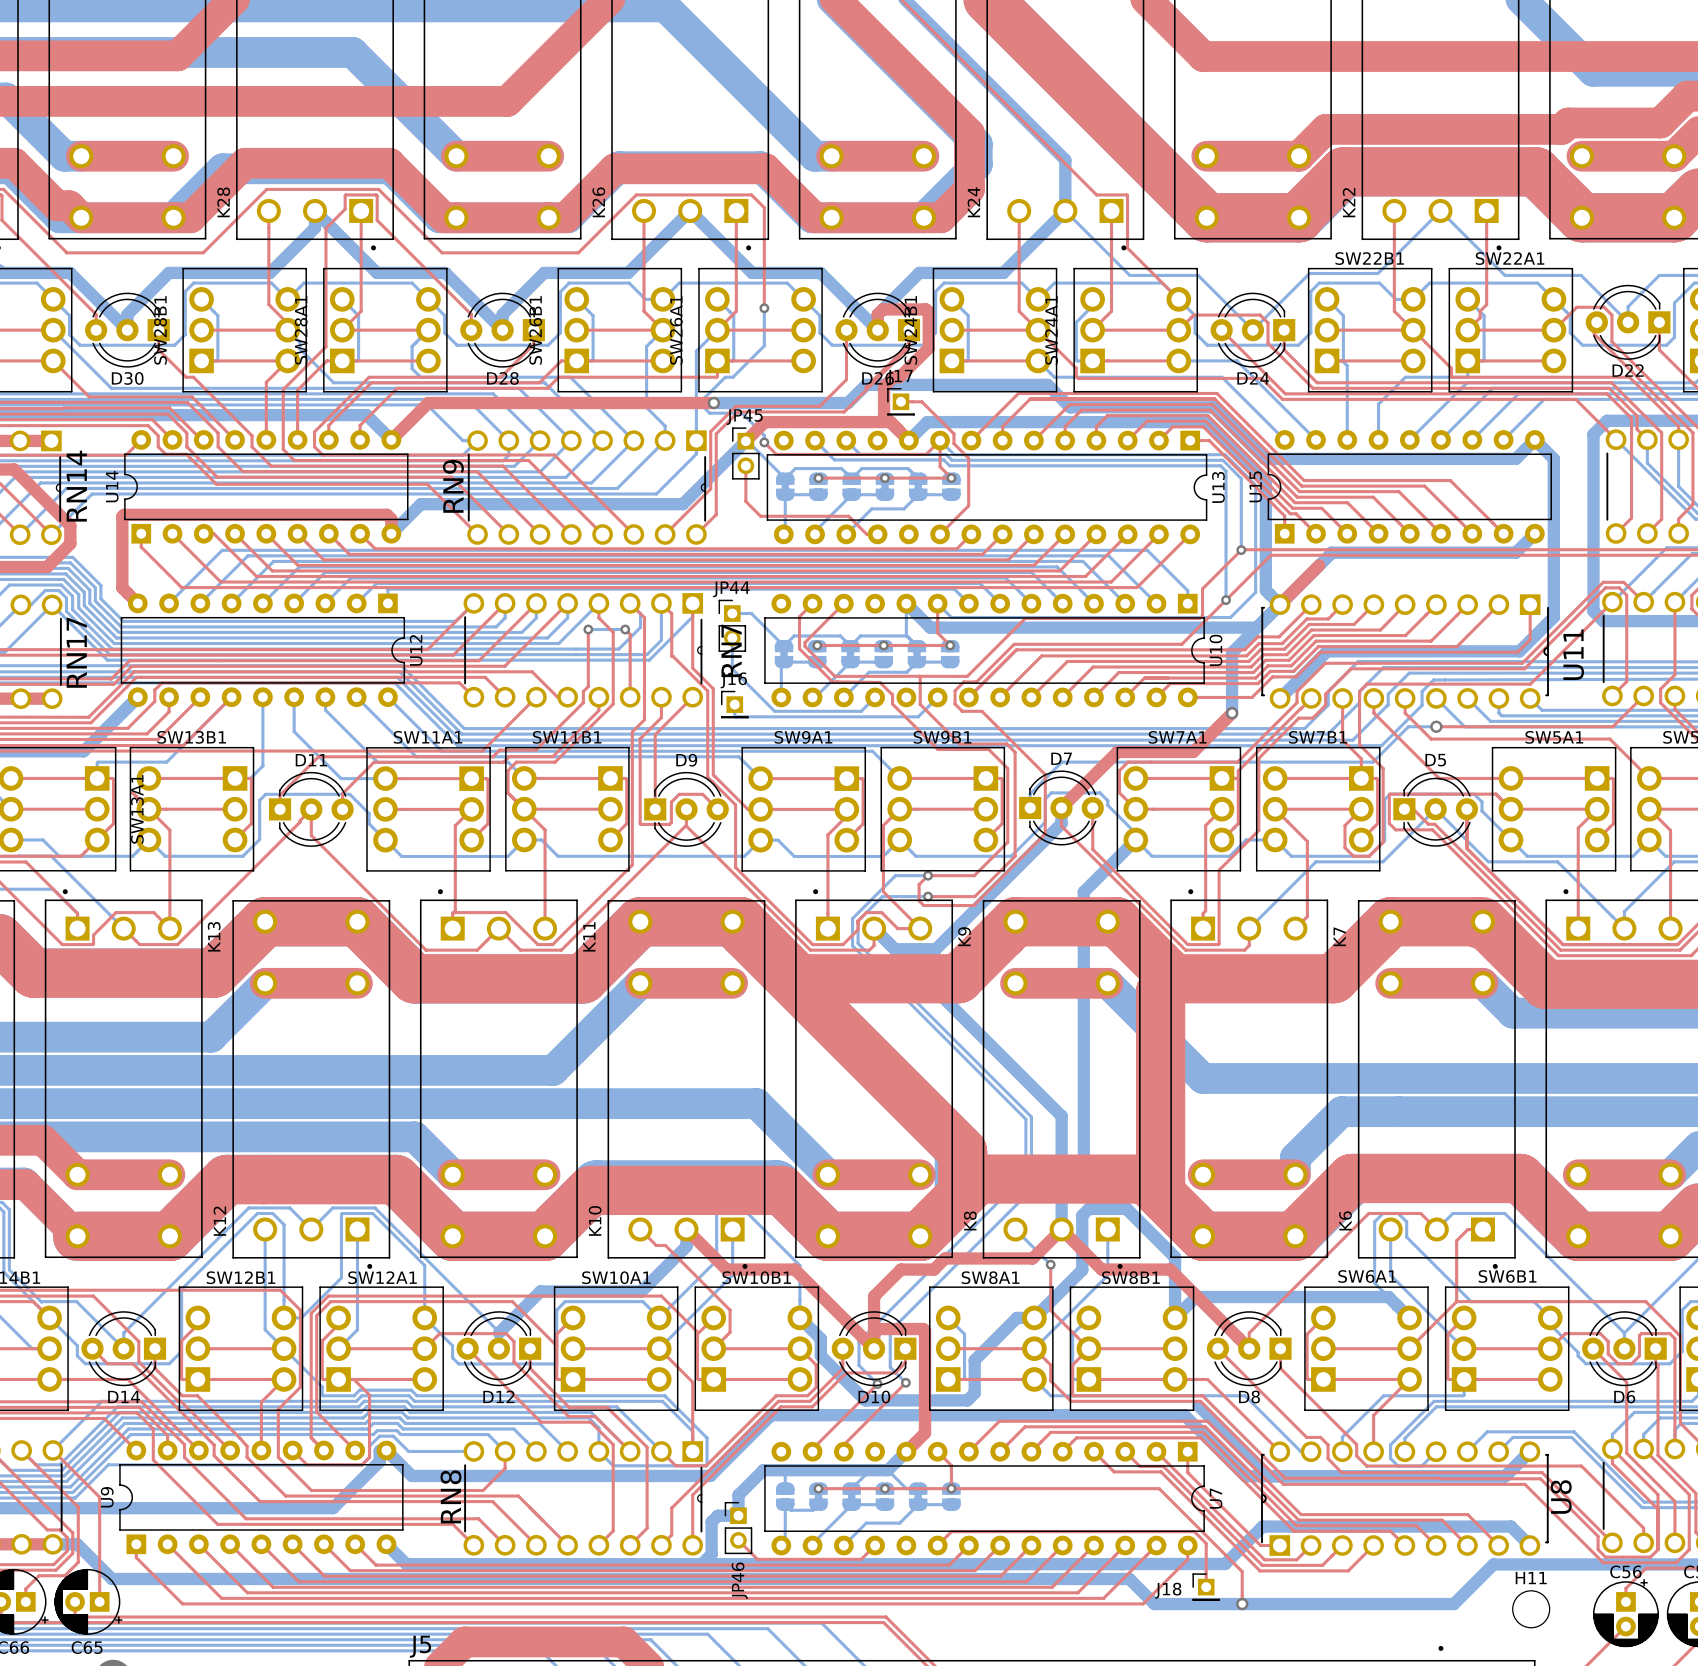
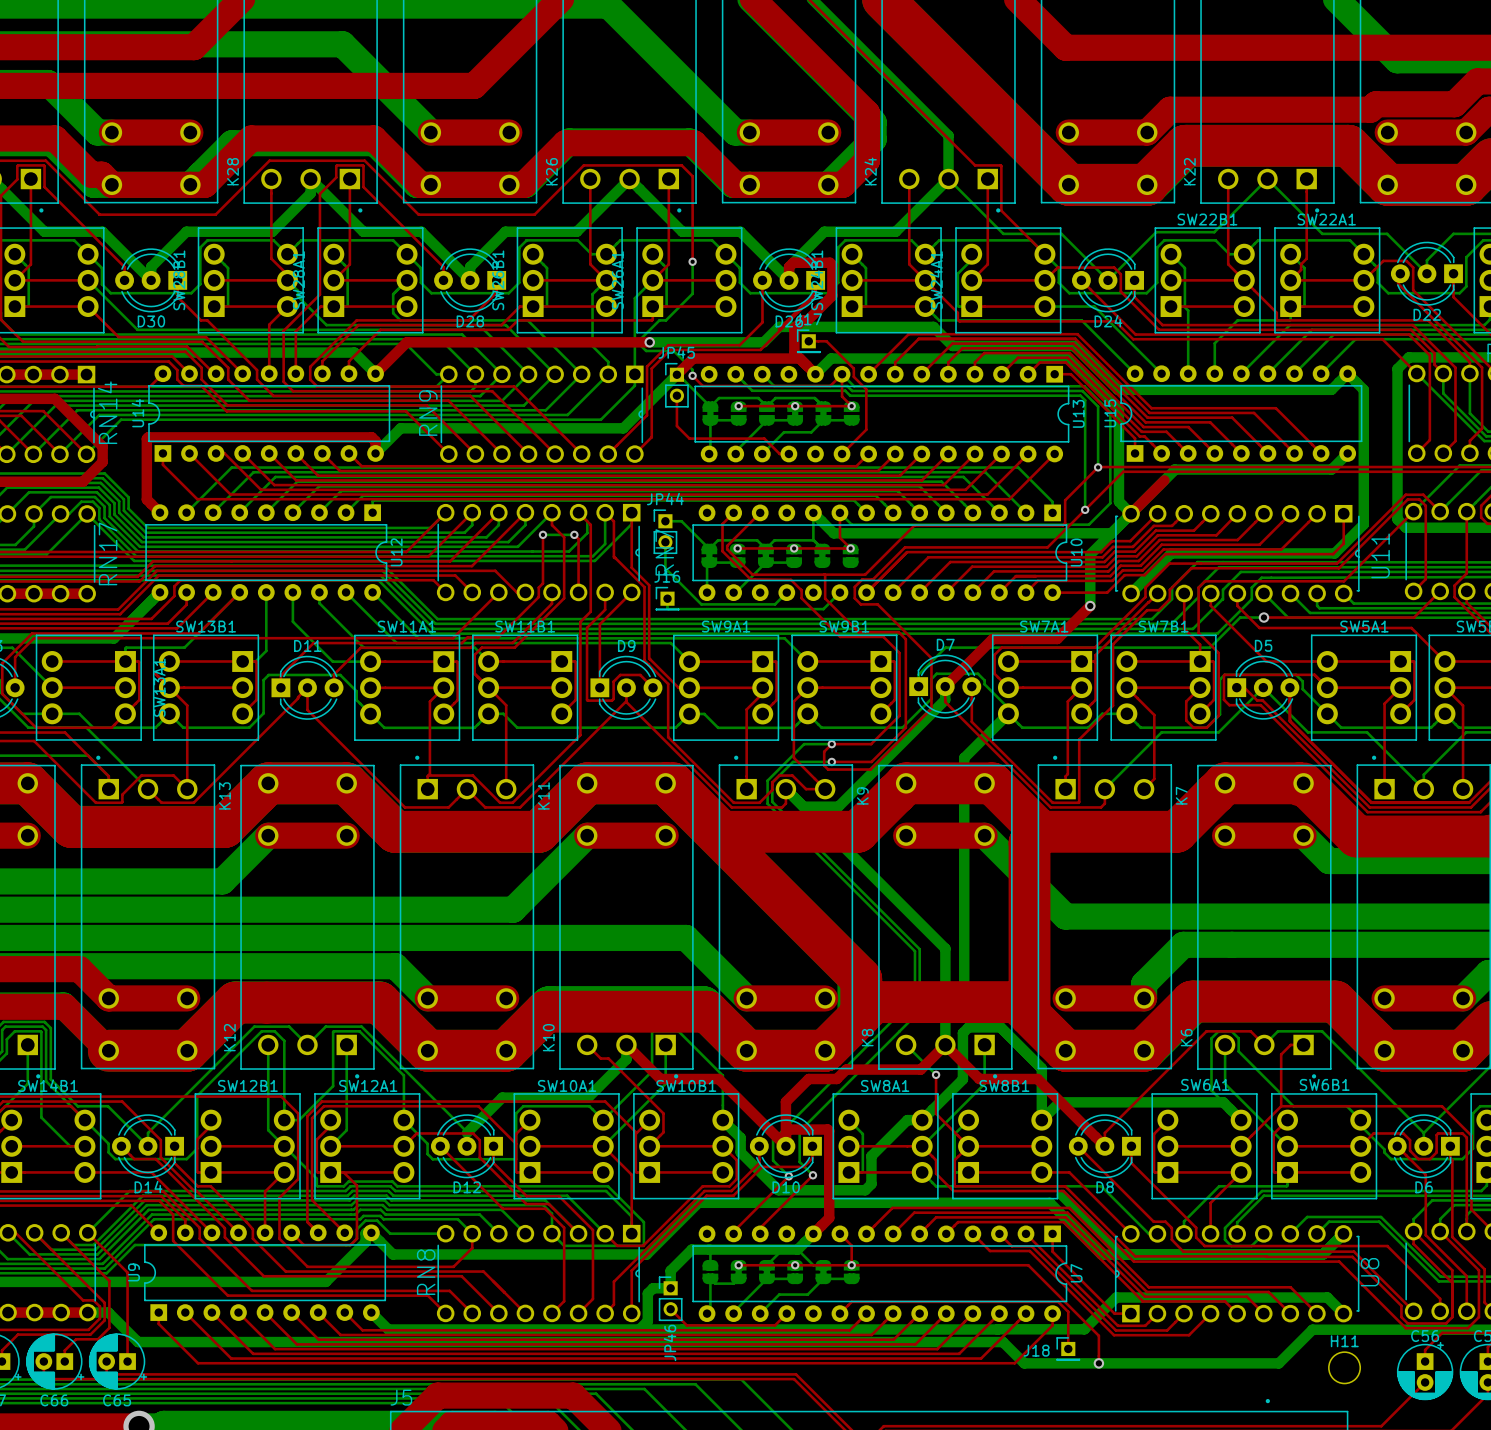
bottom track: (950, 662) (916, 662) (906, 672) (869, 672) (843, 697) -> none

